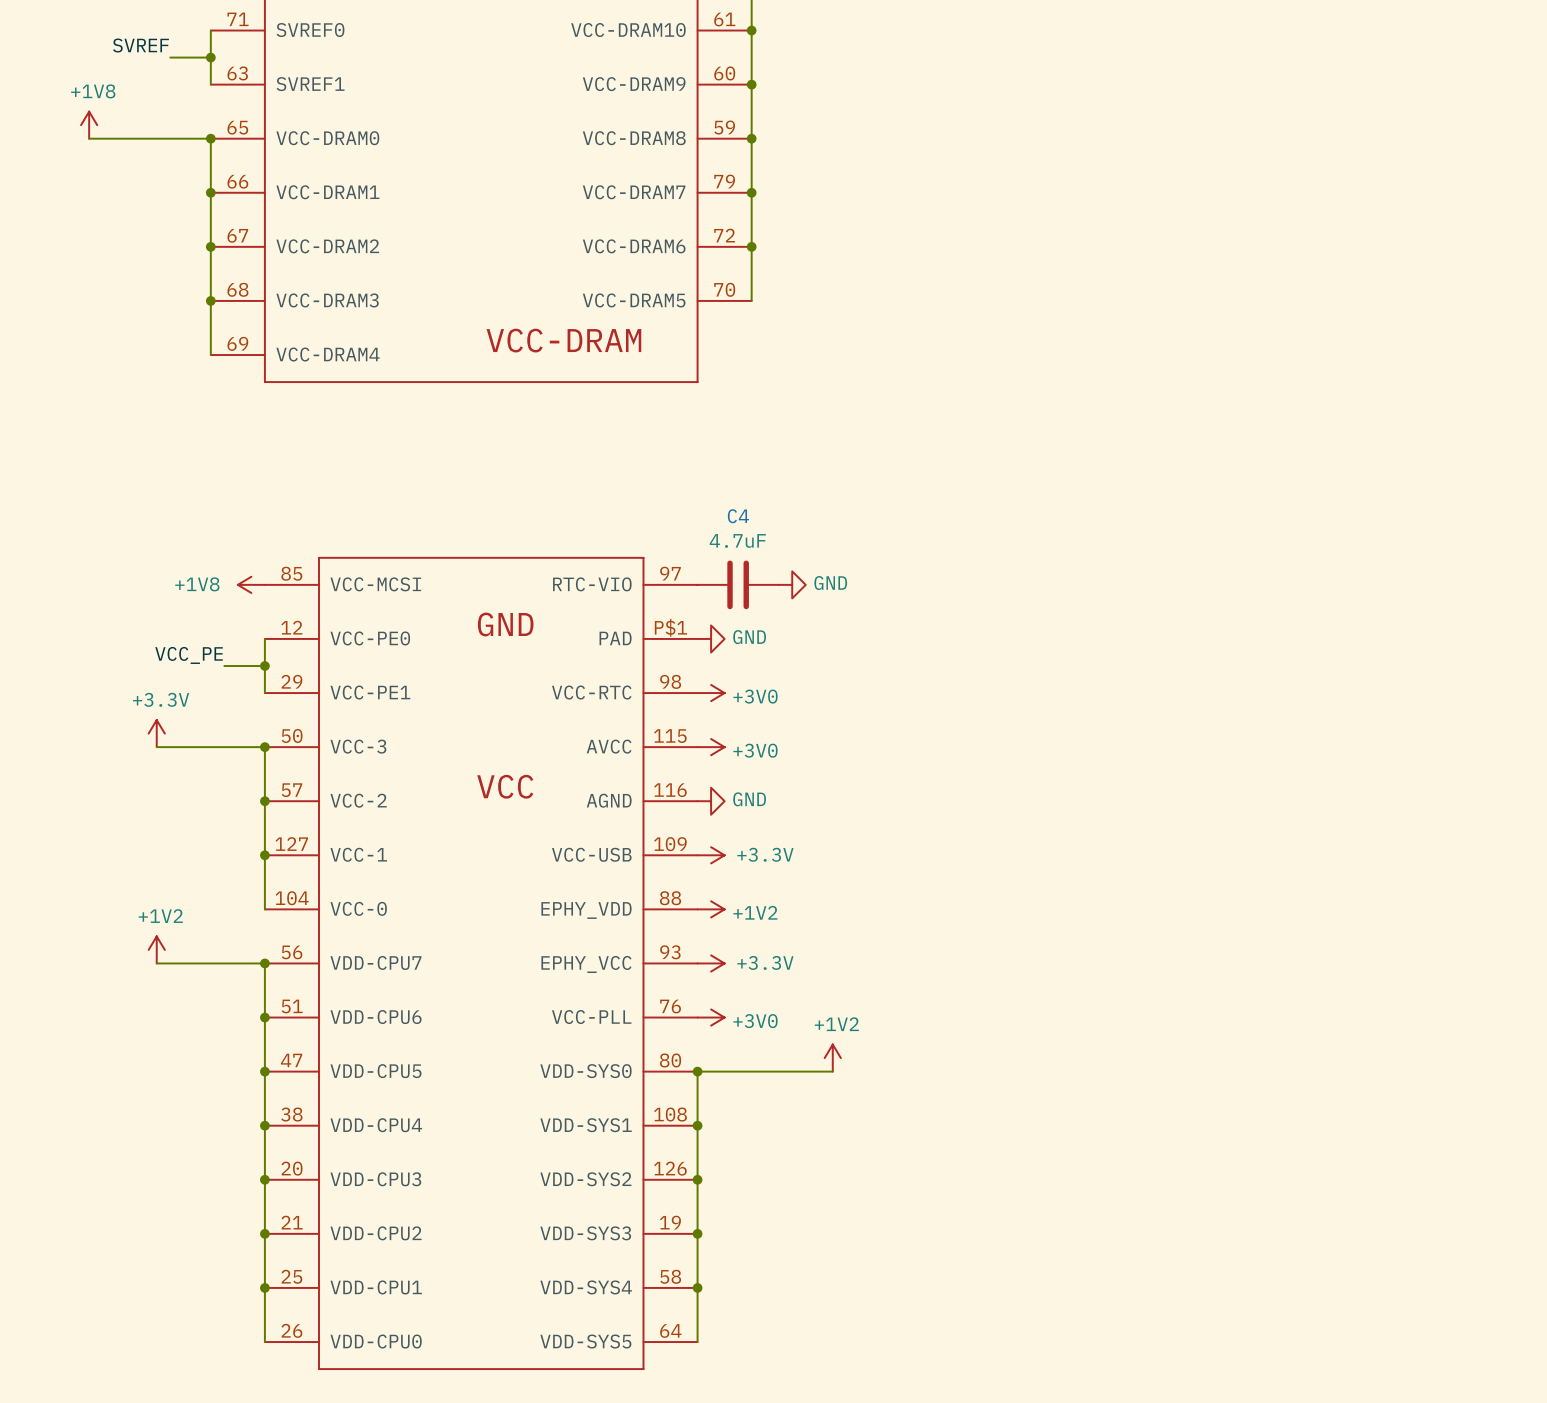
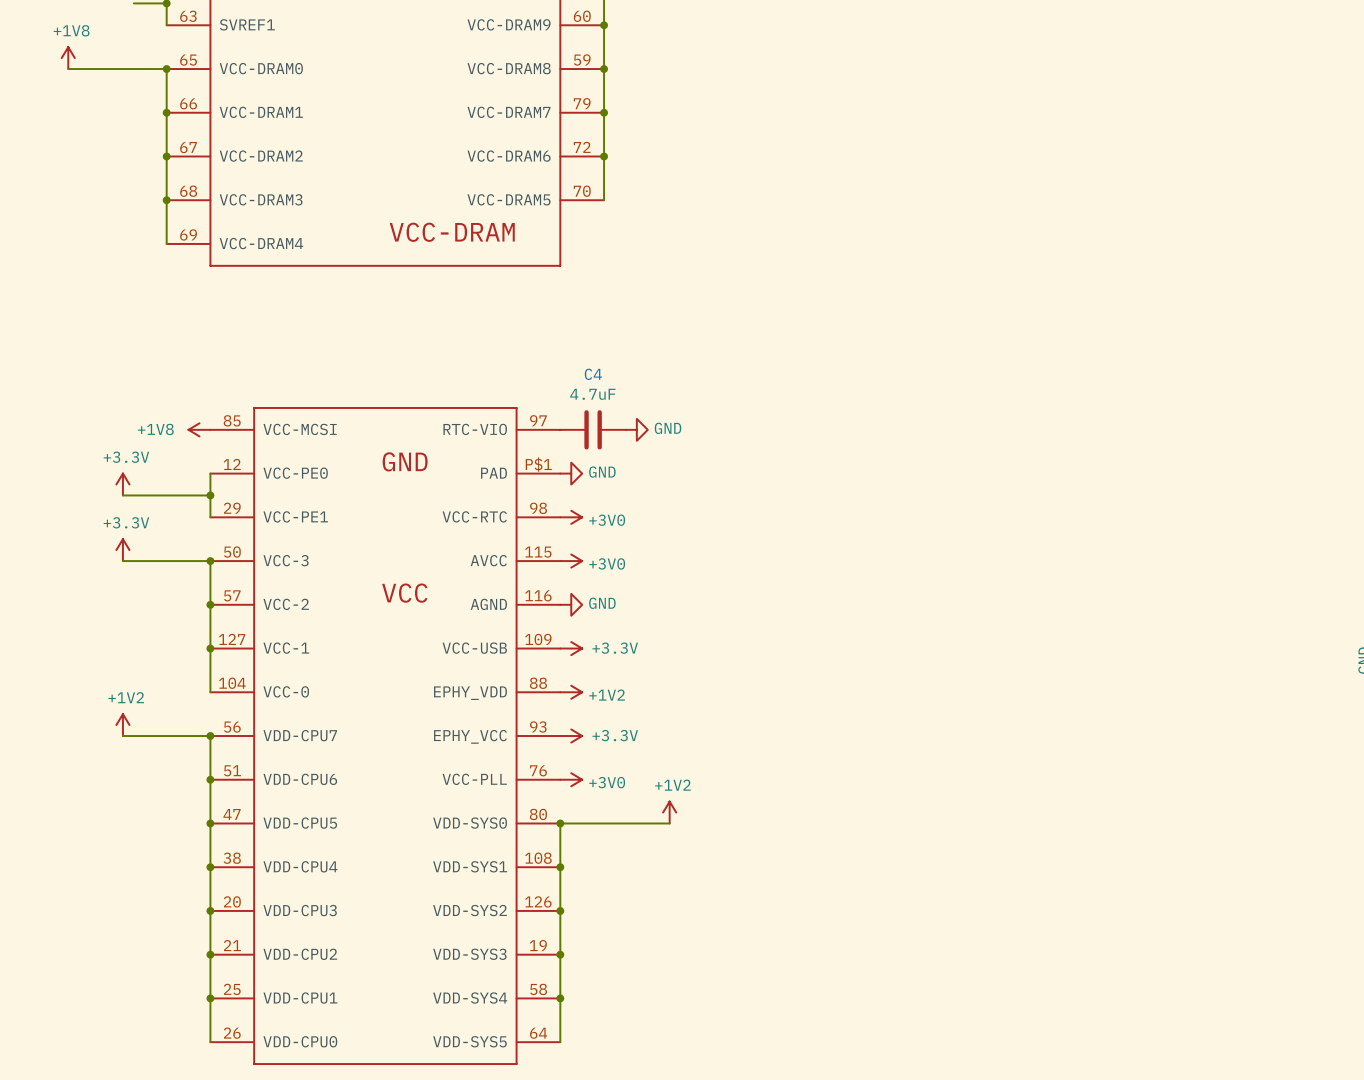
power symbol: none -> +3.3V (122, 484)
label: VCC_PE (189, 655) -> none
wire: none -> (122, 495) (177, 495)

